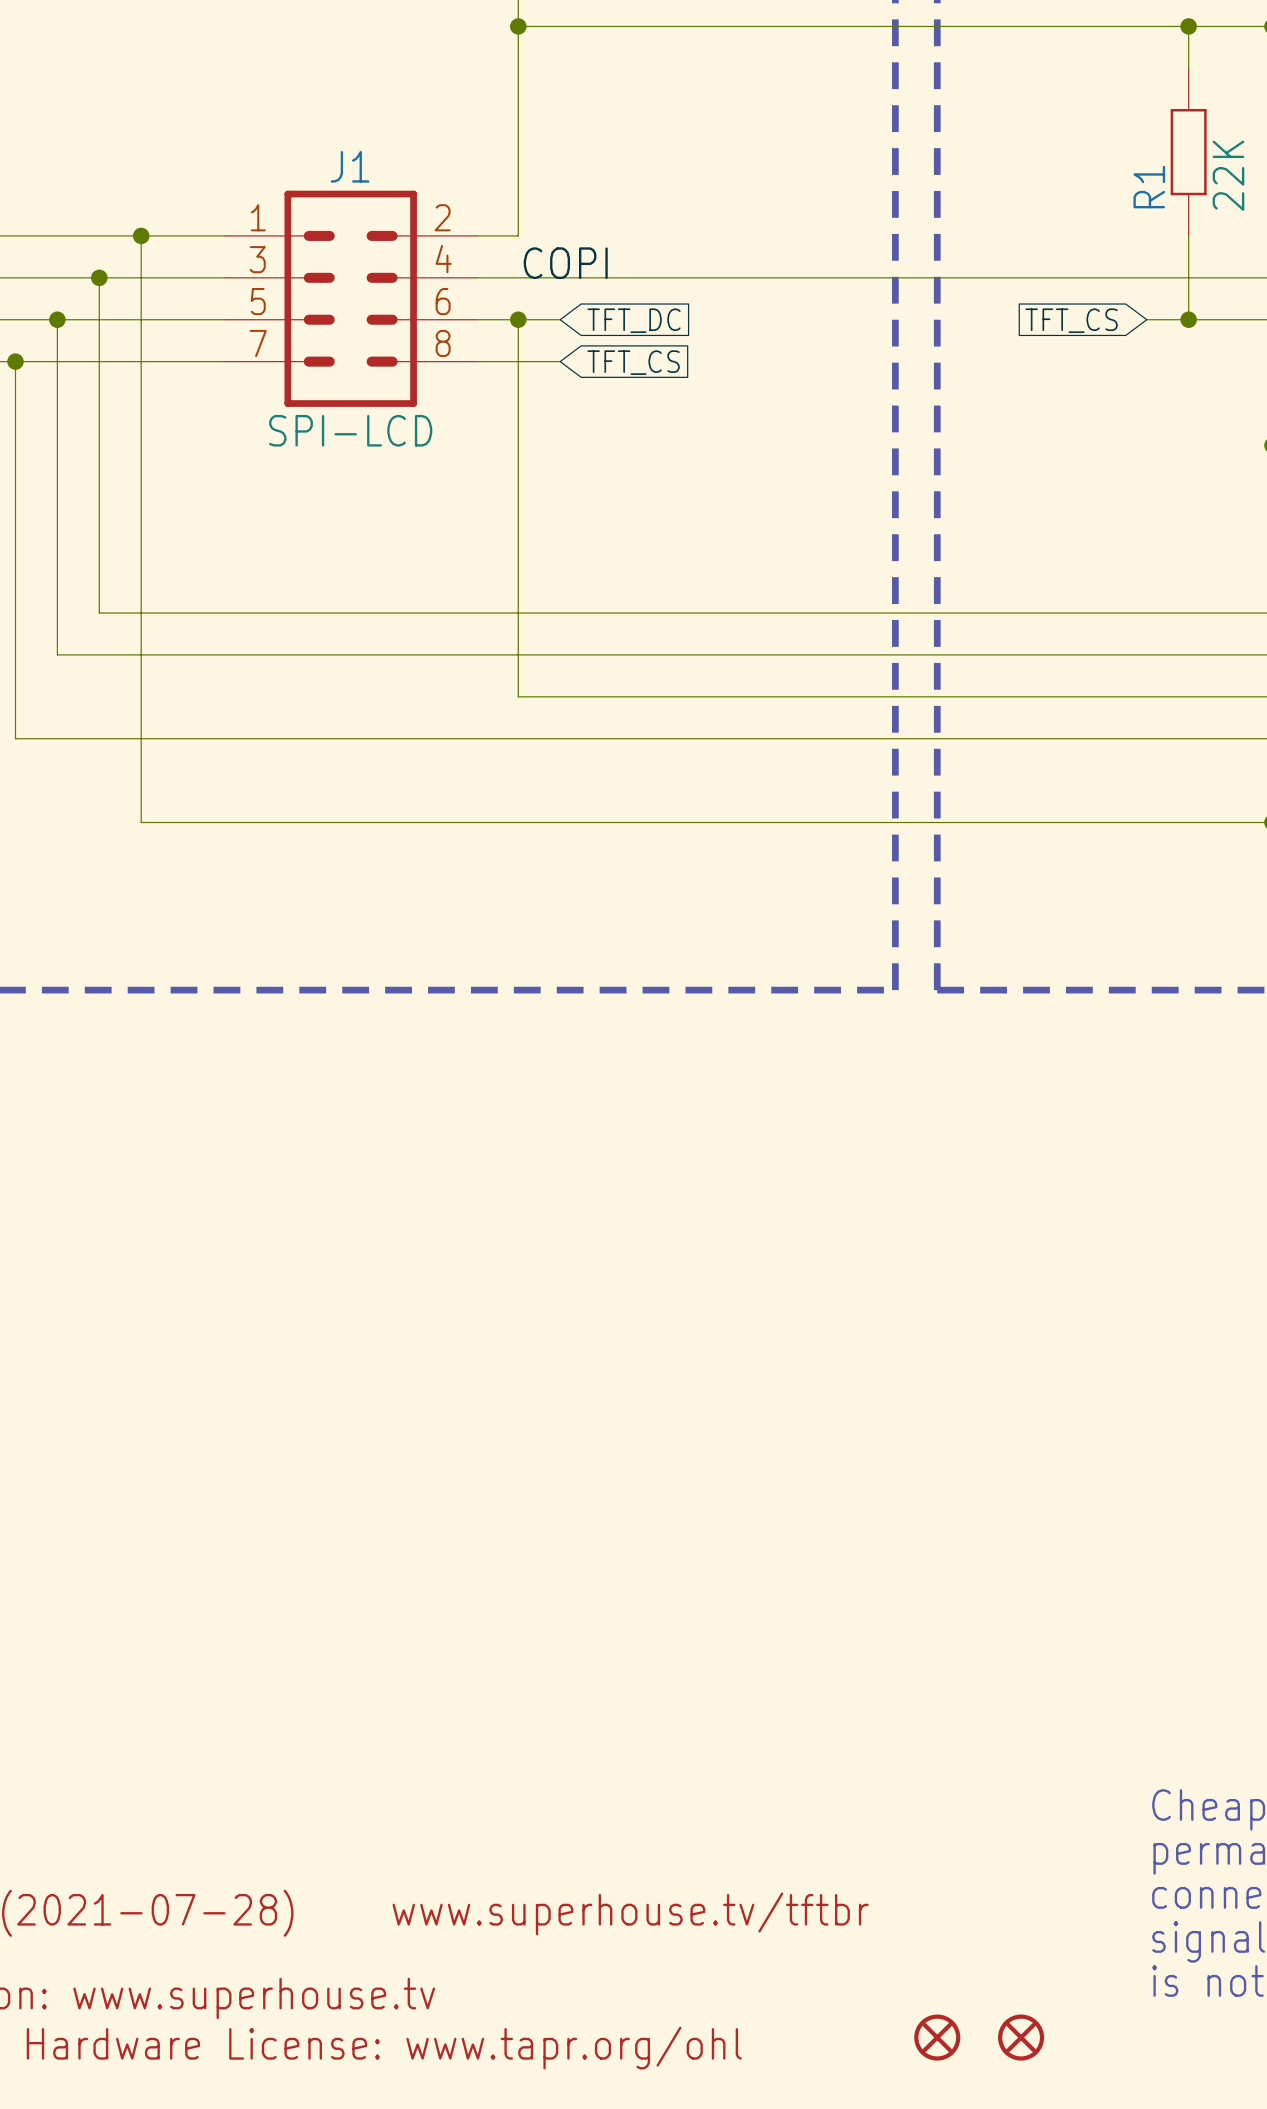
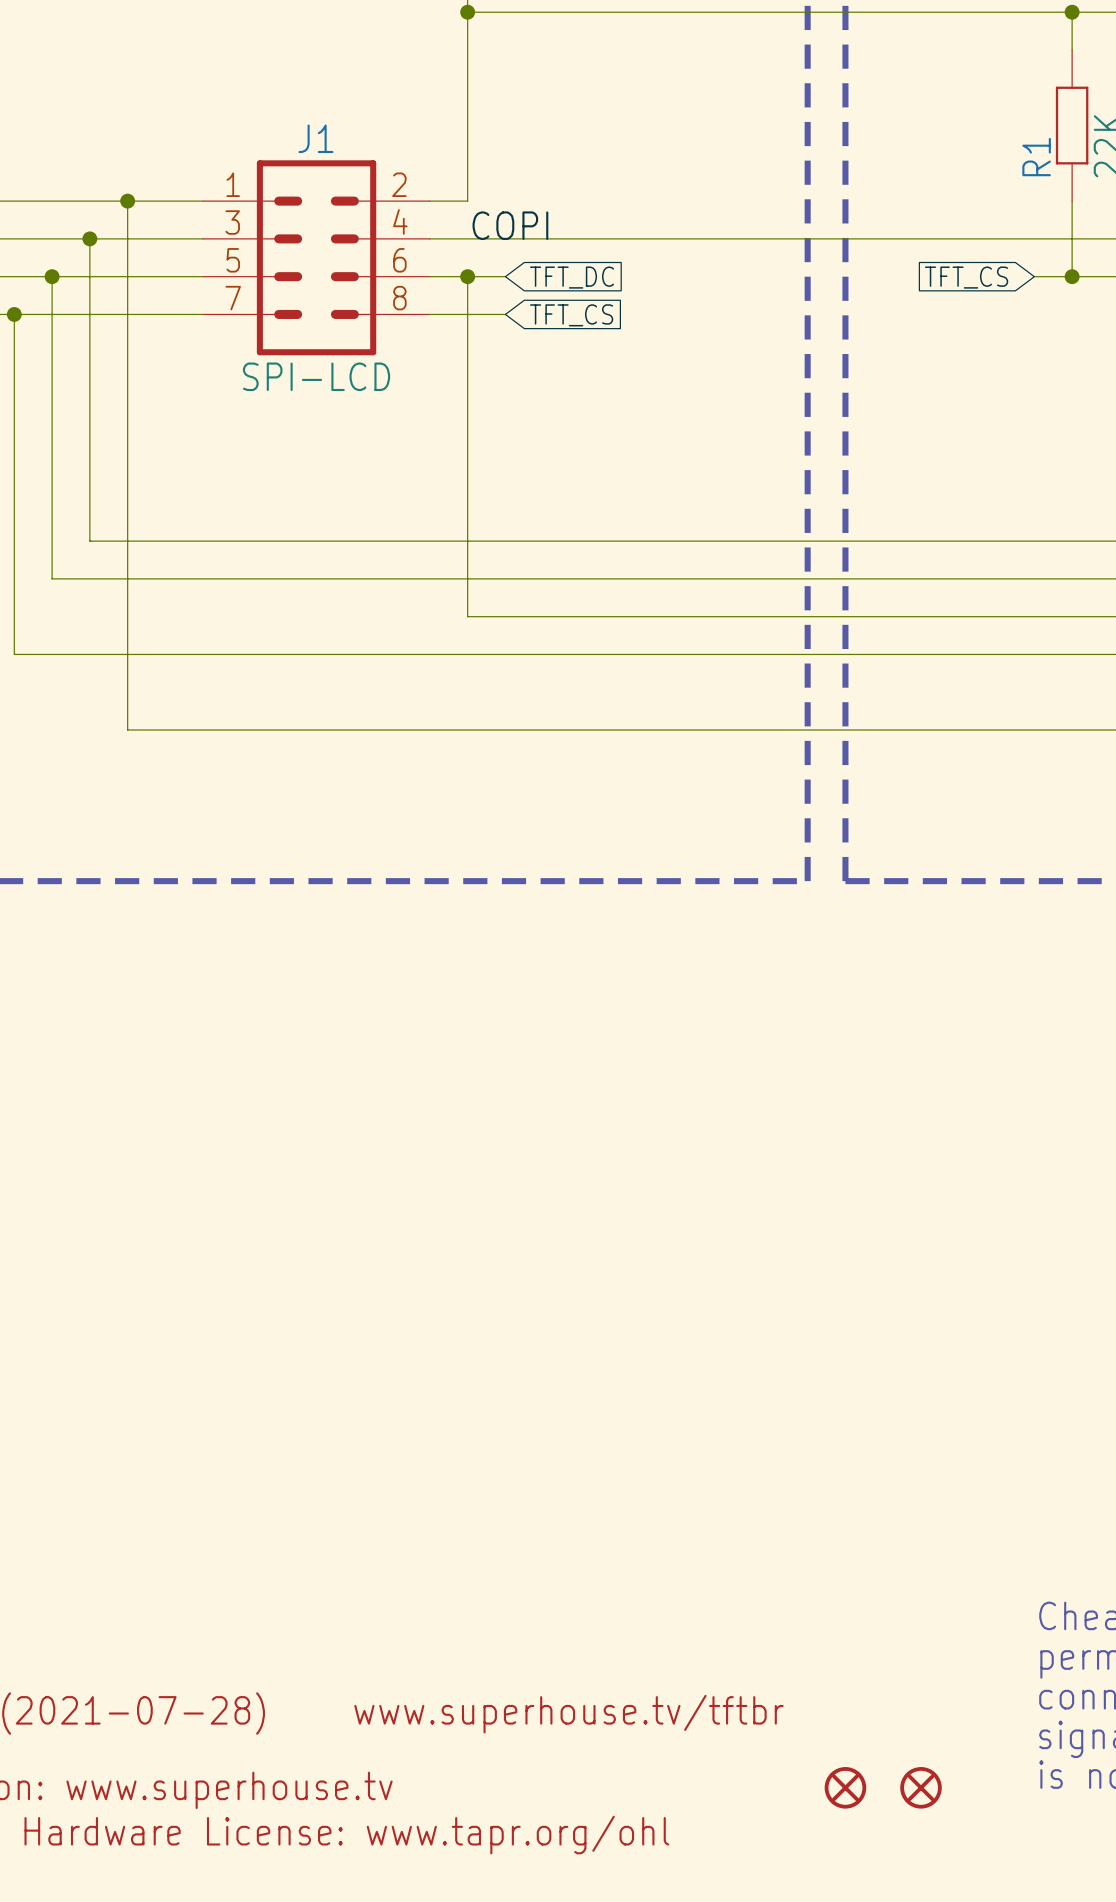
part position: (937, 2037) -> (845, 1787)
part position: (1021, 2037) -> (921, 1787)

